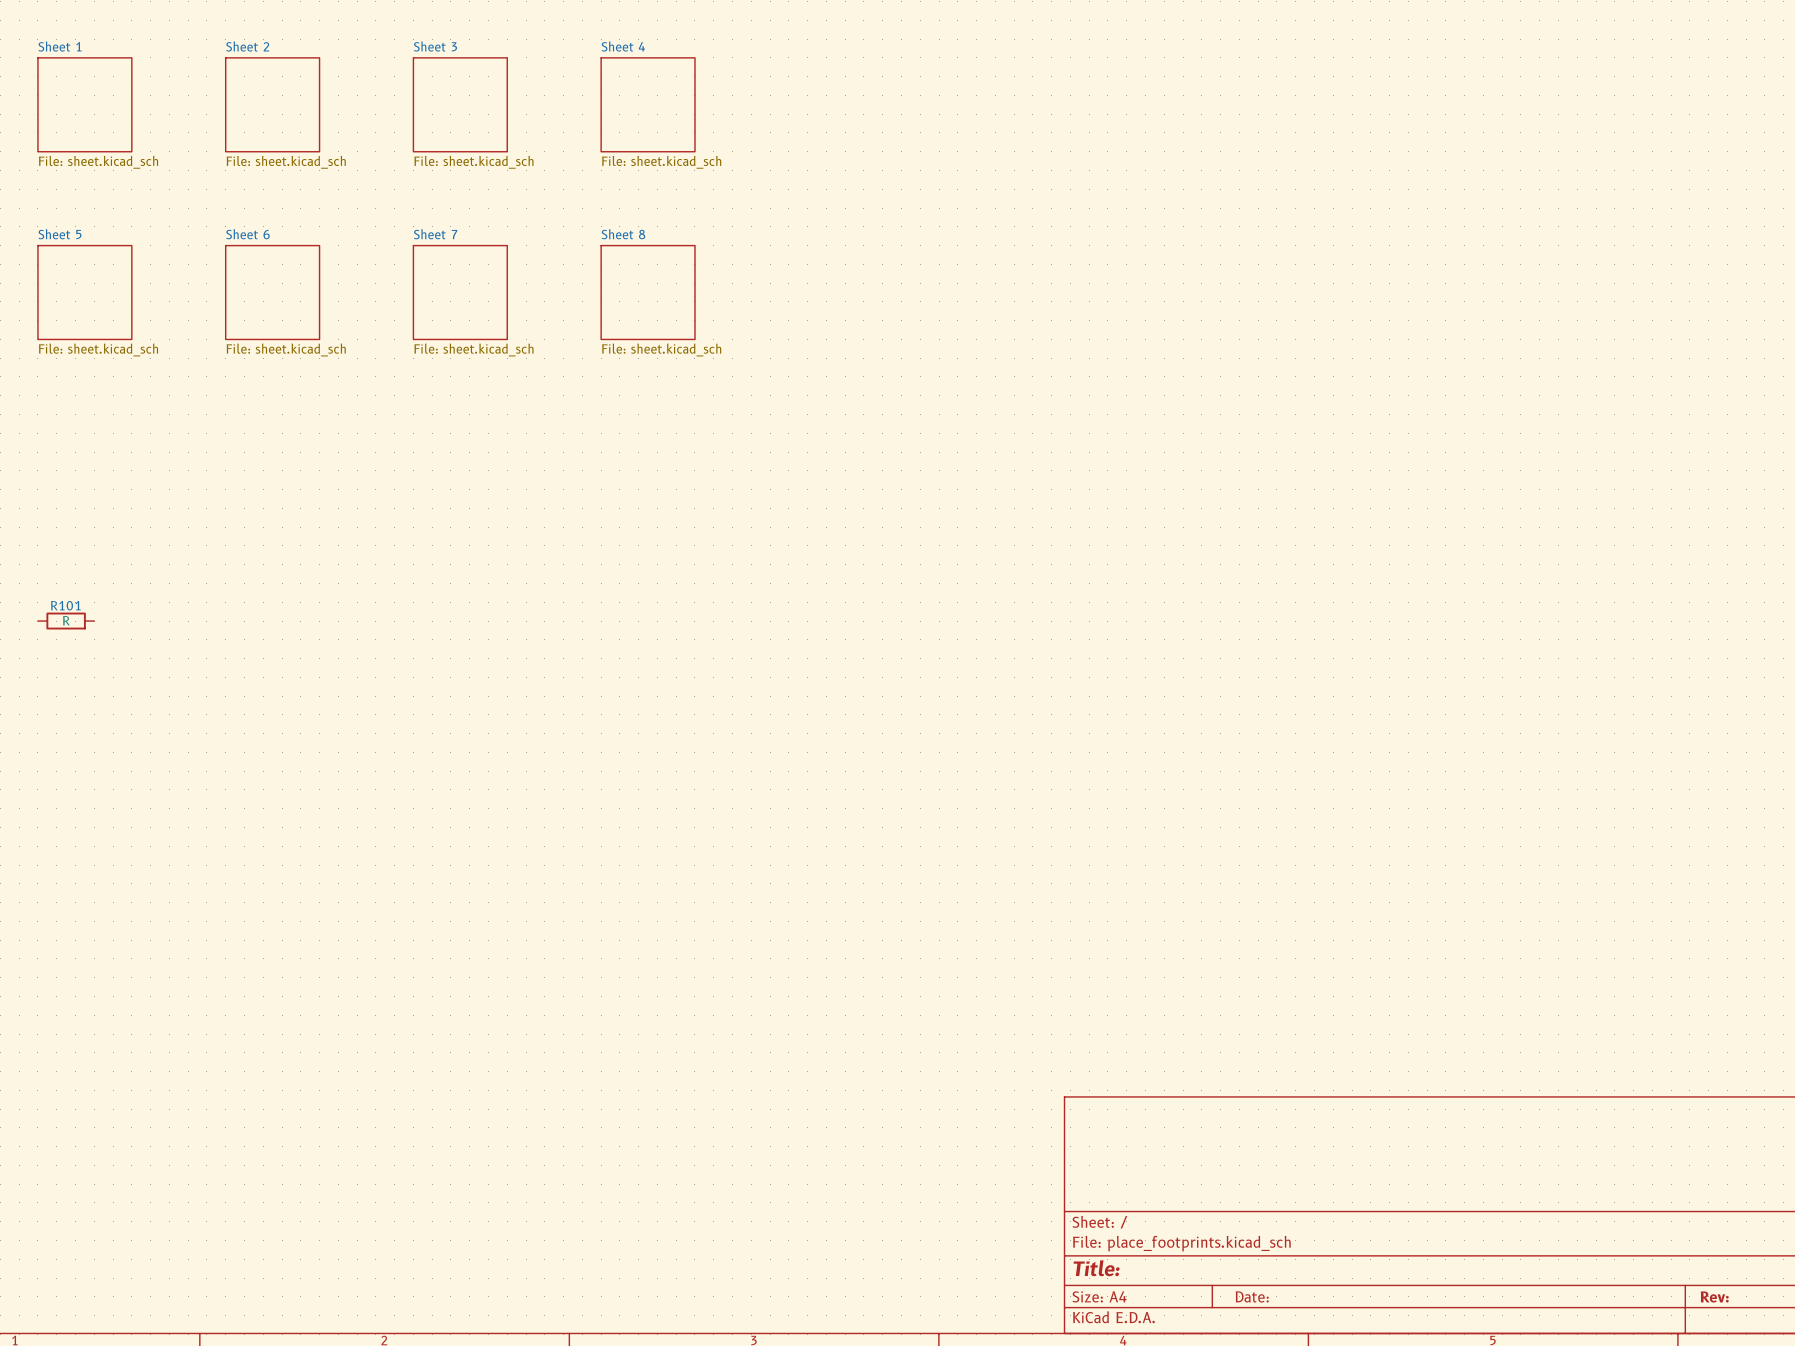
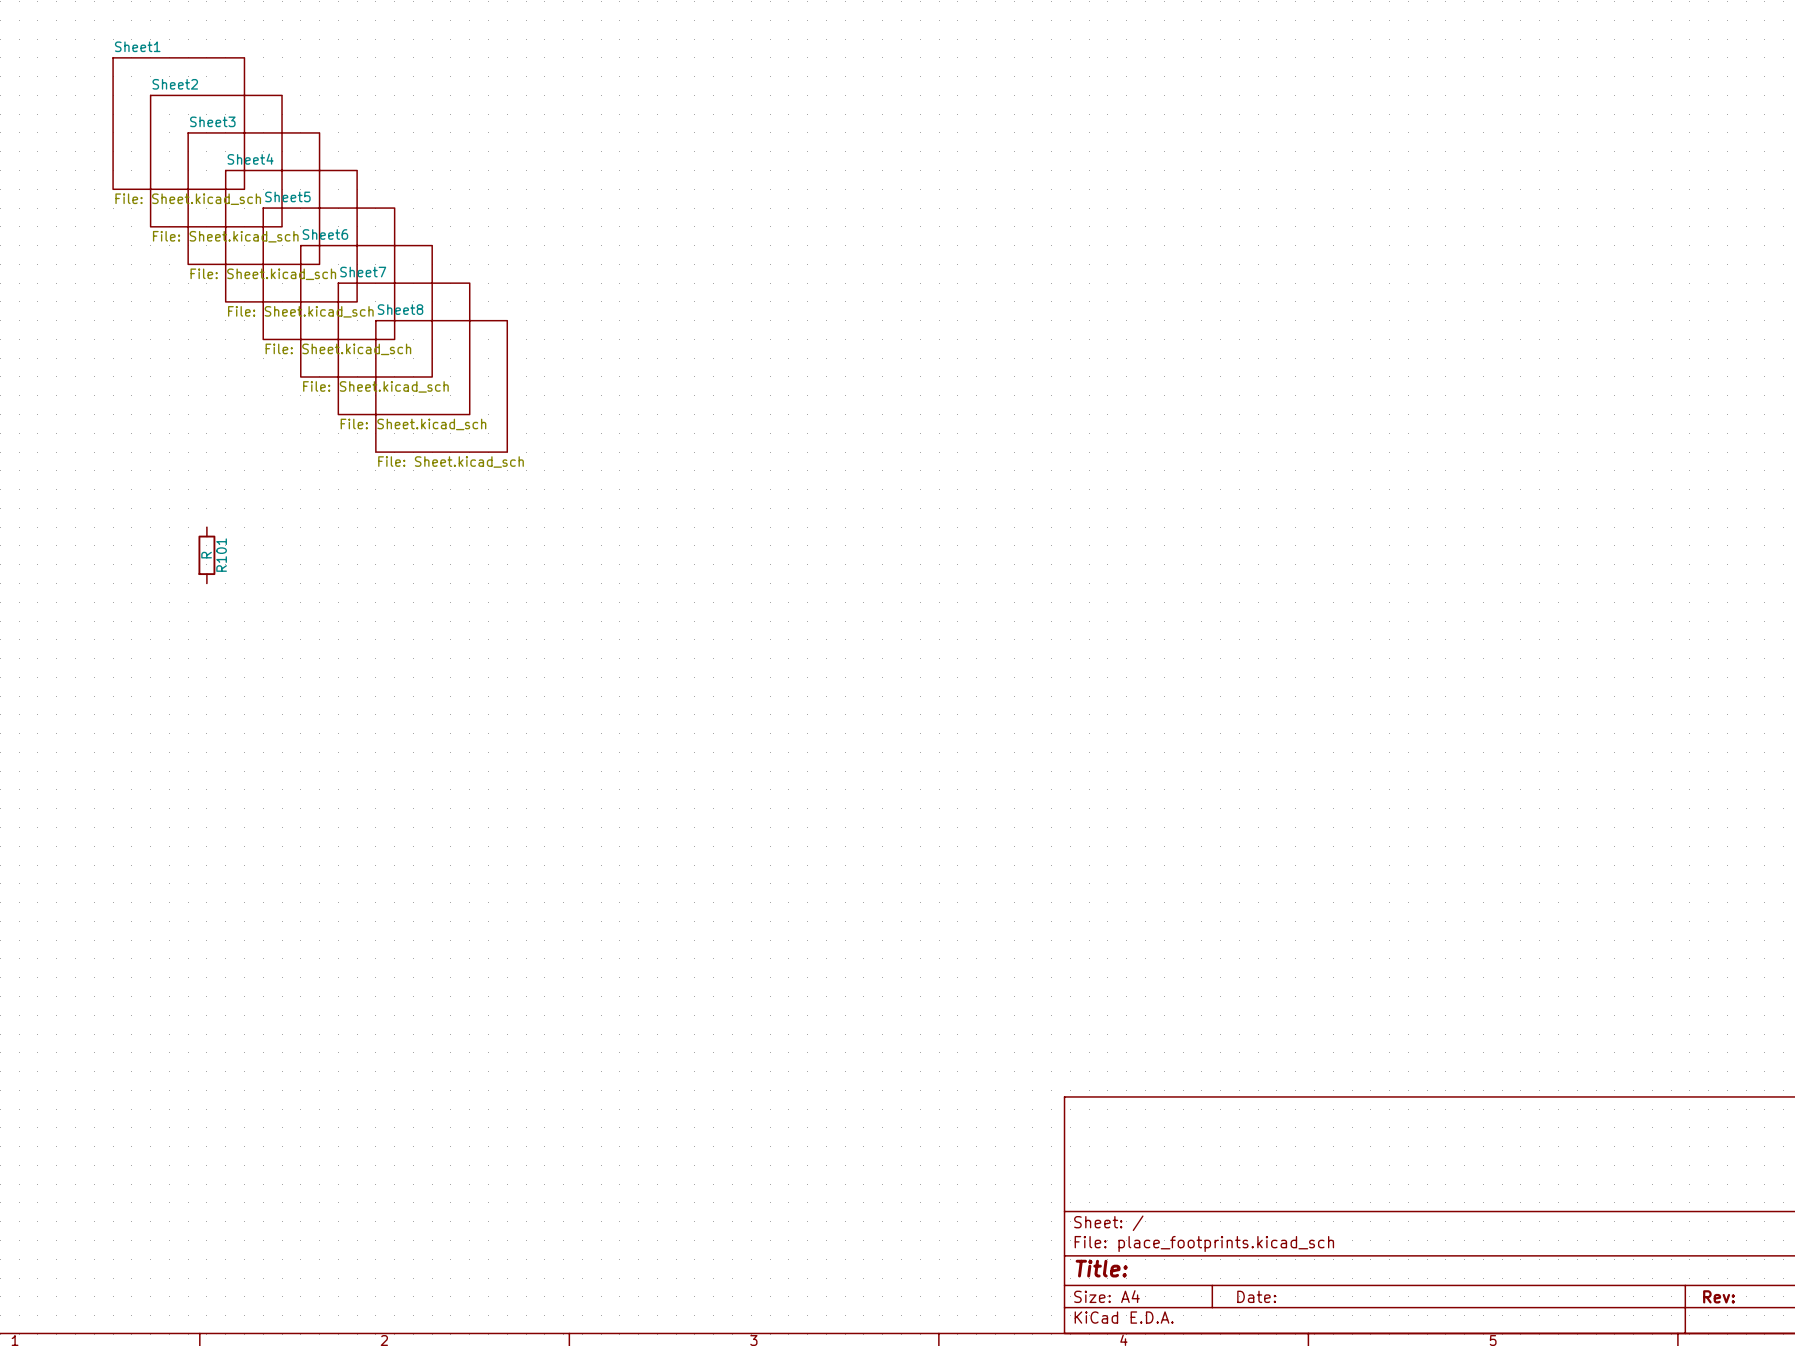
sheet Sheet 1: File: sheet.kicad_sch (84, 104) -> none
sheet Sheet 2: File: sheet.kicad_sch (272, 104) -> none
sheet Sheet 3: File: sheet.kicad_sch (460, 104) -> none
sheet Sheet 4: File: sheet.kicad_sch (648, 104) -> none
sheet Sheet1: none -> File: Sheet.kicad_sch (178, 123)
sheet Sheet2: none -> File: Sheet.kicad_sch (216, 161)
sheet Sheet3: none -> File: Sheet.kicad_sch (253, 198)
sheet Sheet4: none -> File: Sheet.kicad_sch (291, 236)
sheet Sheet5: none -> File: Sheet.kicad_sch (328, 273)
sheet Sheet 5: File: sheet.kicad_sch (84, 292) -> none
sheet Sheet 6: File: sheet.kicad_sch (272, 292) -> none
sheet Sheet 7: File: sheet.kicad_sch (460, 292) -> none
sheet Sheet 8: File: sheet.kicad_sch (648, 292) -> none
sheet Sheet6: none -> File: Sheet.kicad_sch (366, 311)
sheet Sheet7: none -> File: Sheet.kicad_sch (404, 348)
sheet Sheet8: none -> File: Sheet.kicad_sch (441, 386)
R101 rotation: 0° (66, 621) -> 90° clockwise (206, 555)
R101 position: (66, 621) -> (206, 555)

